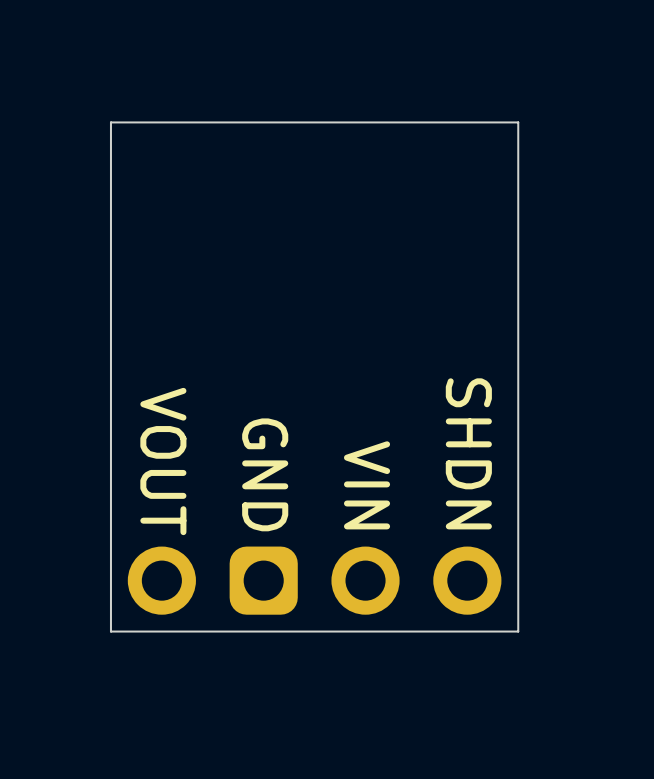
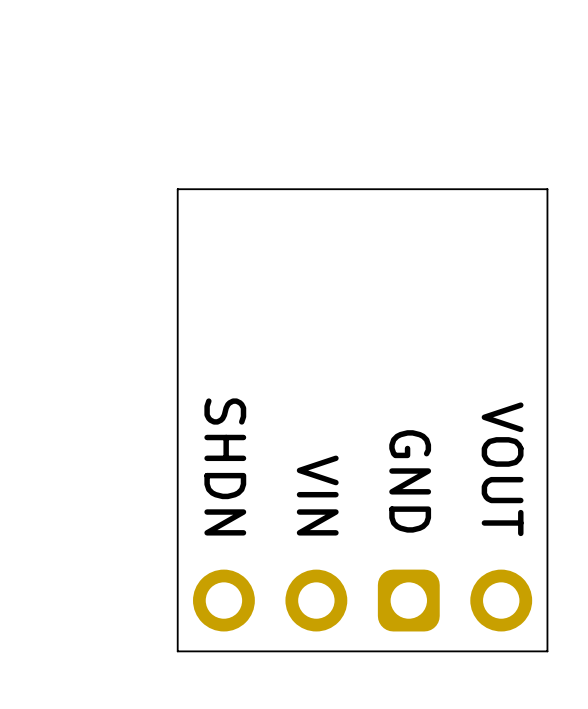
text position: SHDN (468, 453) -> SHDN (225, 466)
text position: VOUT (163, 461) -> VOUT (502, 469)
text position: GND (265, 474) -> GND (410, 481)
text position: VIN (367, 485) -> VIN (317, 495)
part side: top (314, 580) -> bottom (362, 600)

